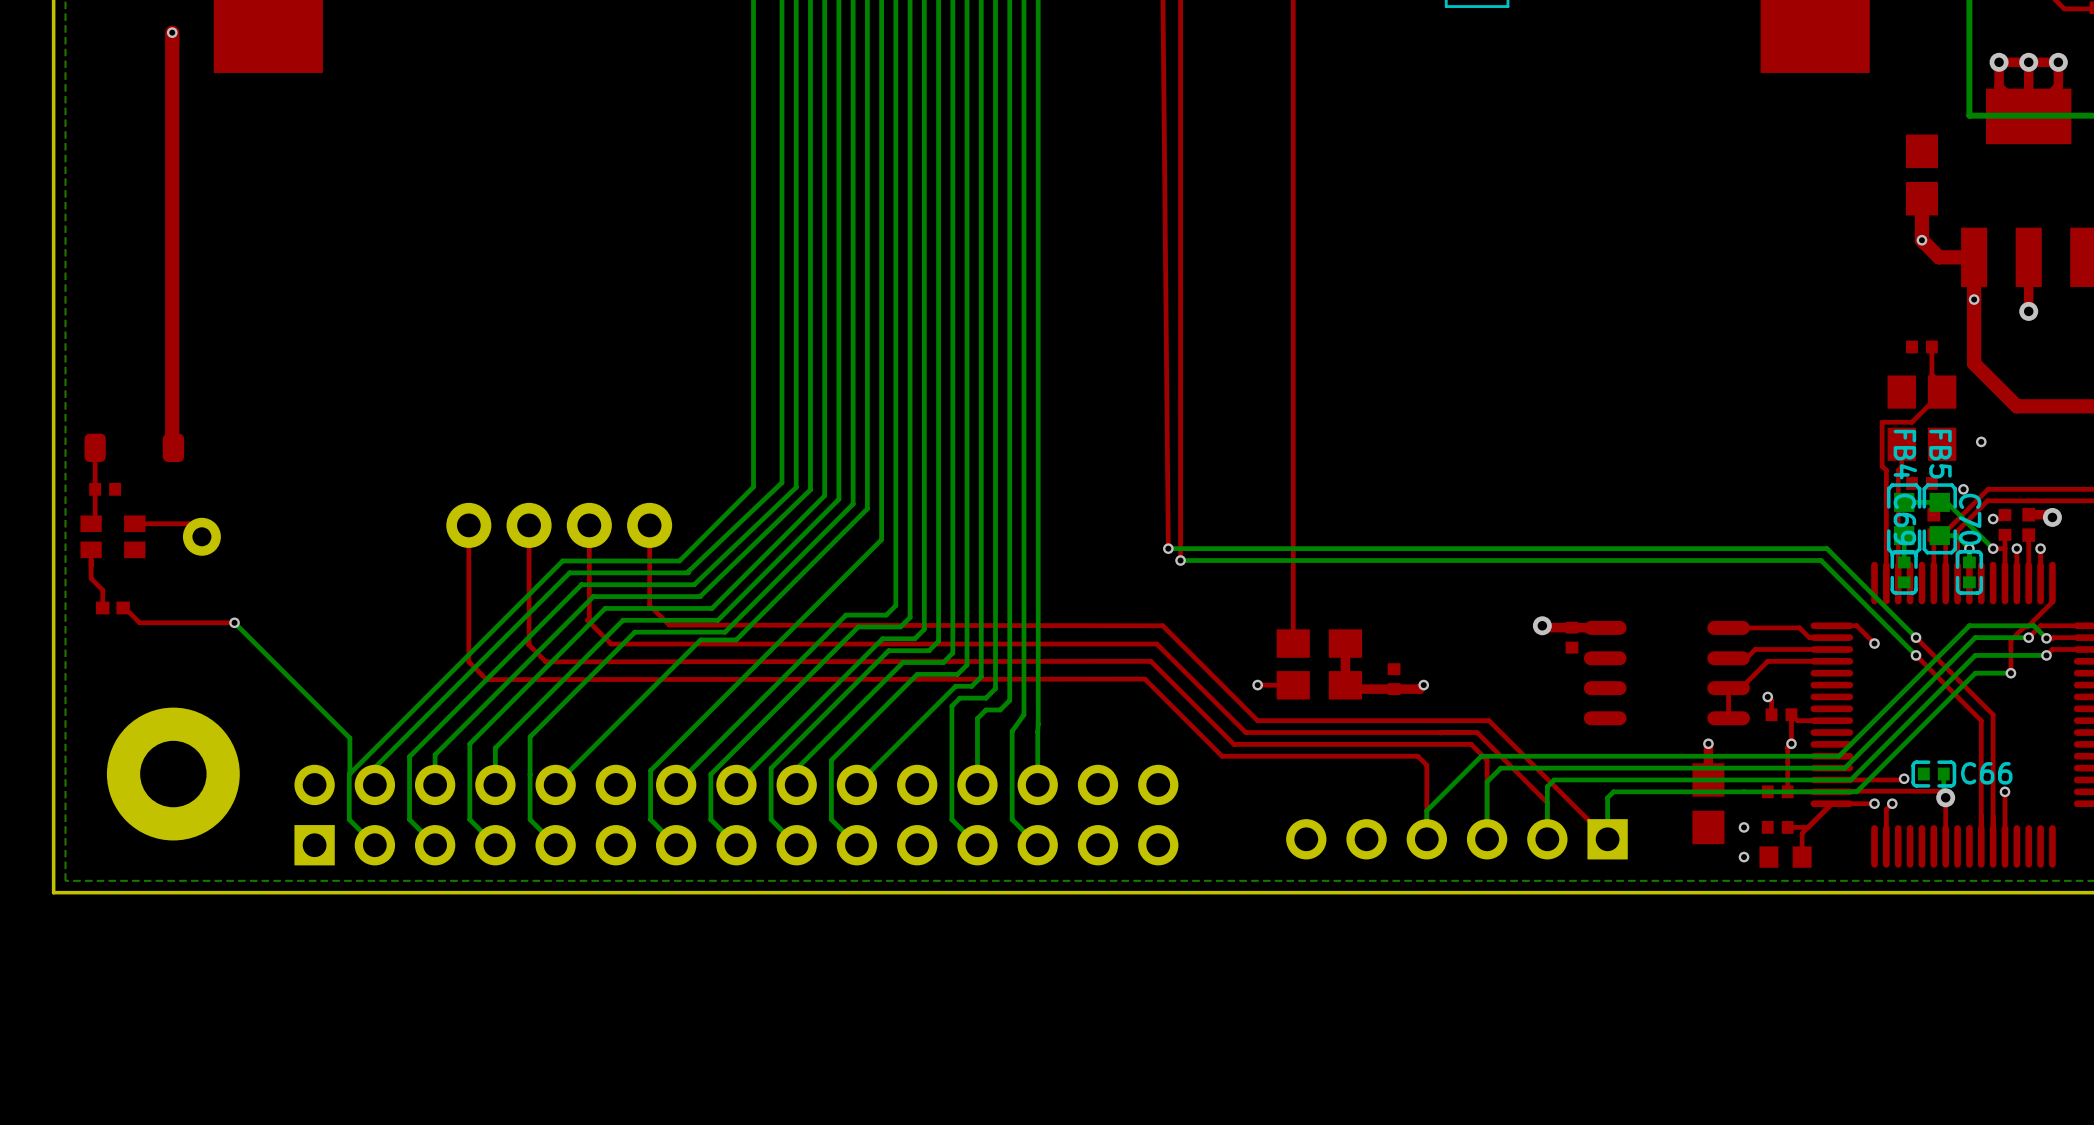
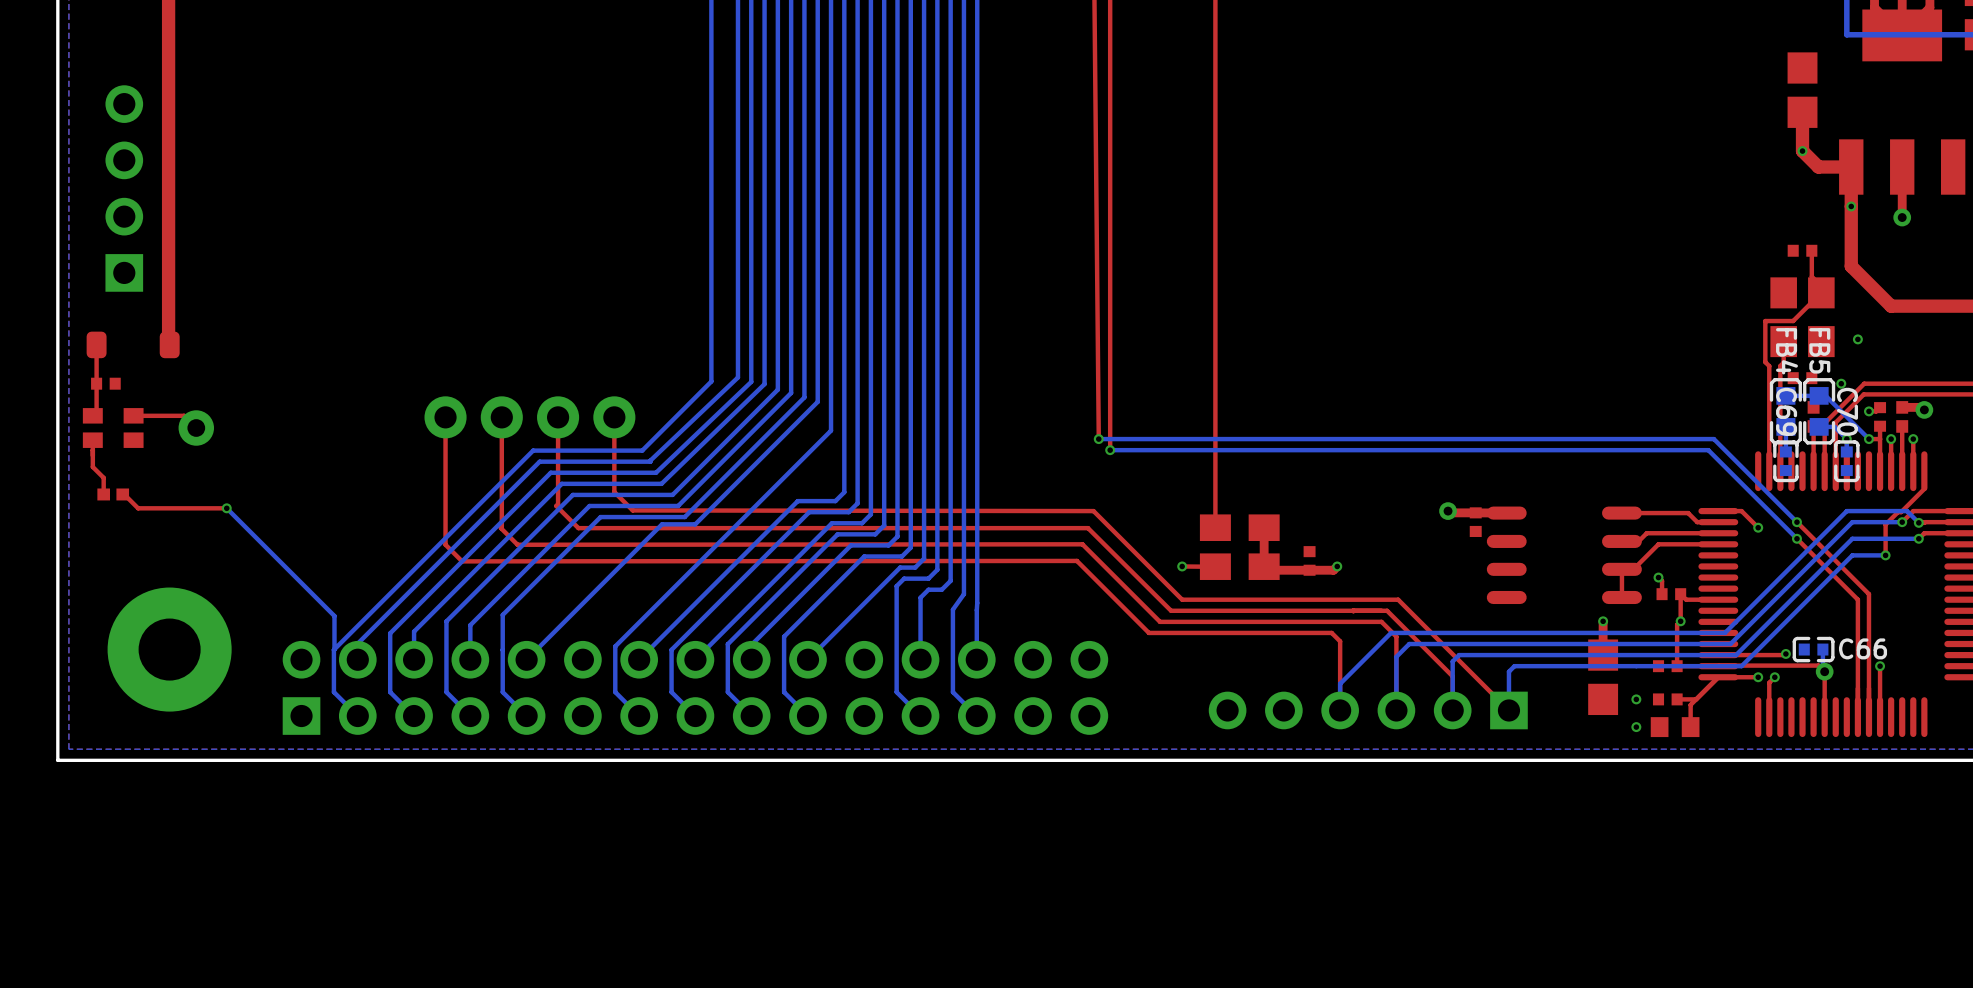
part: none -> (124, 188)

